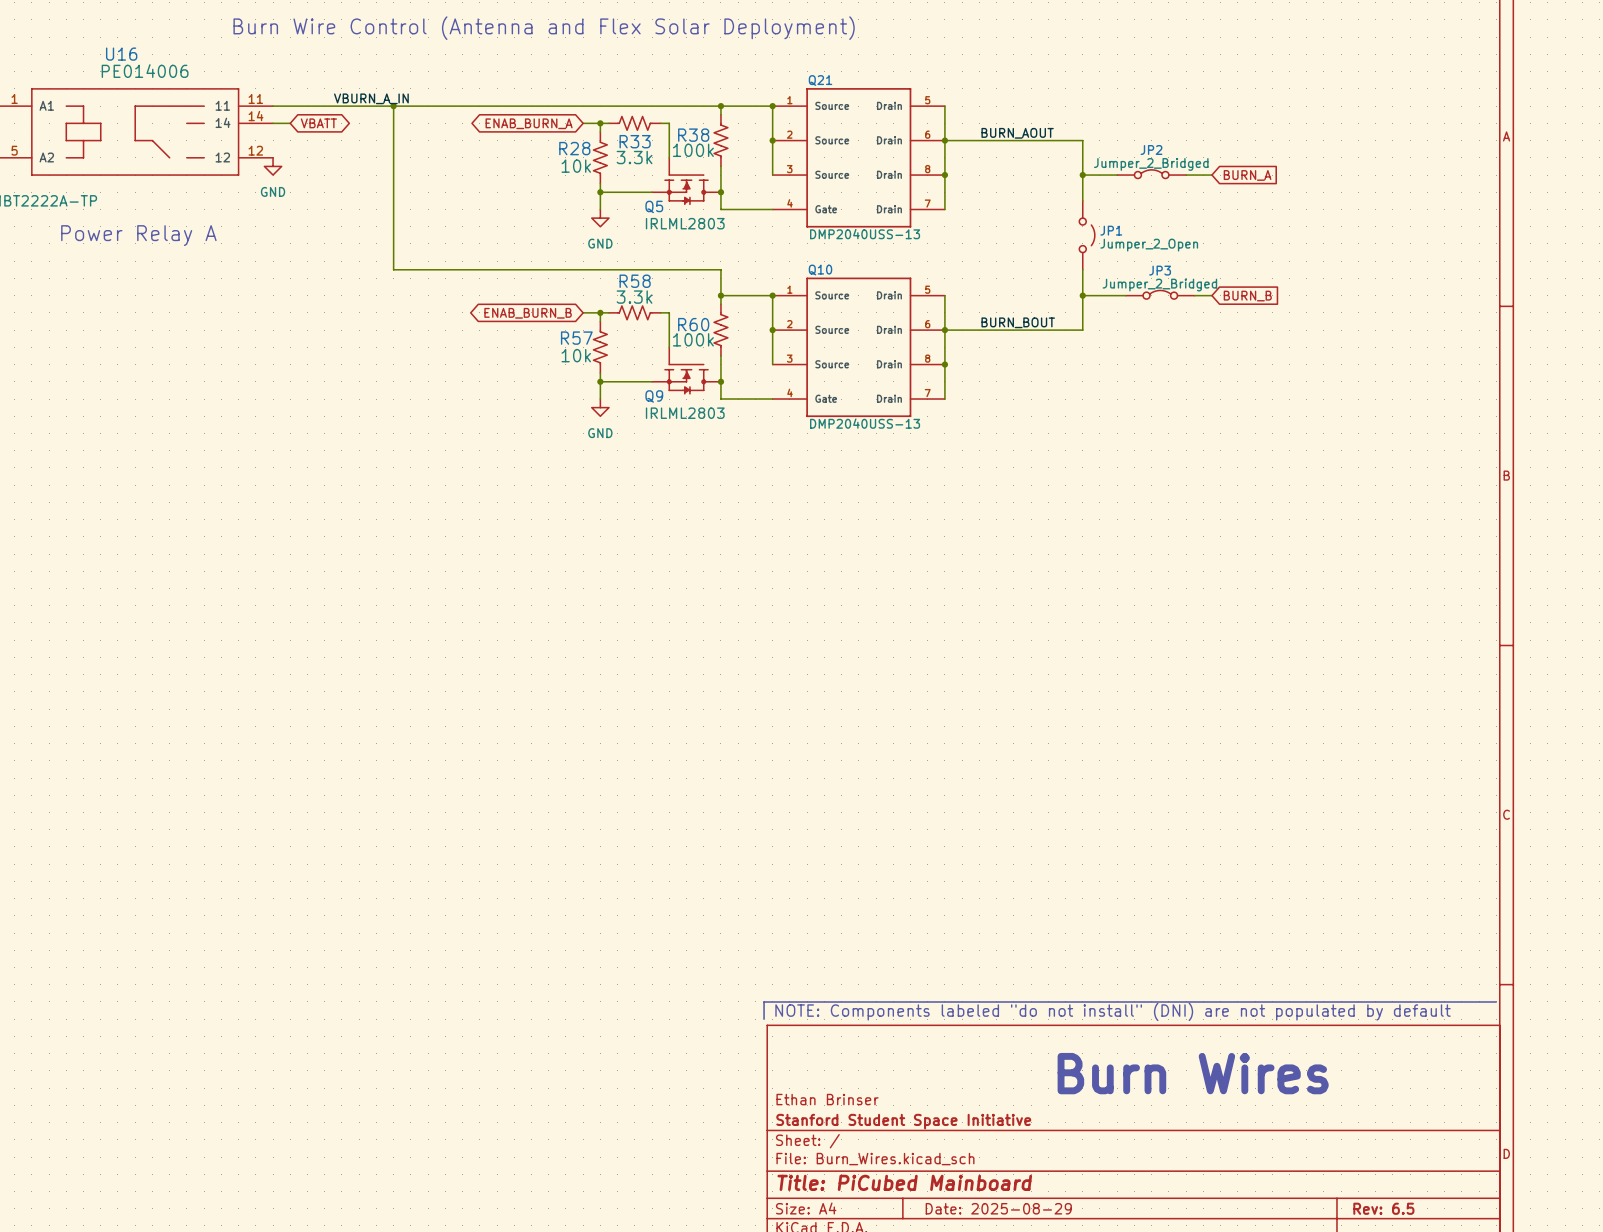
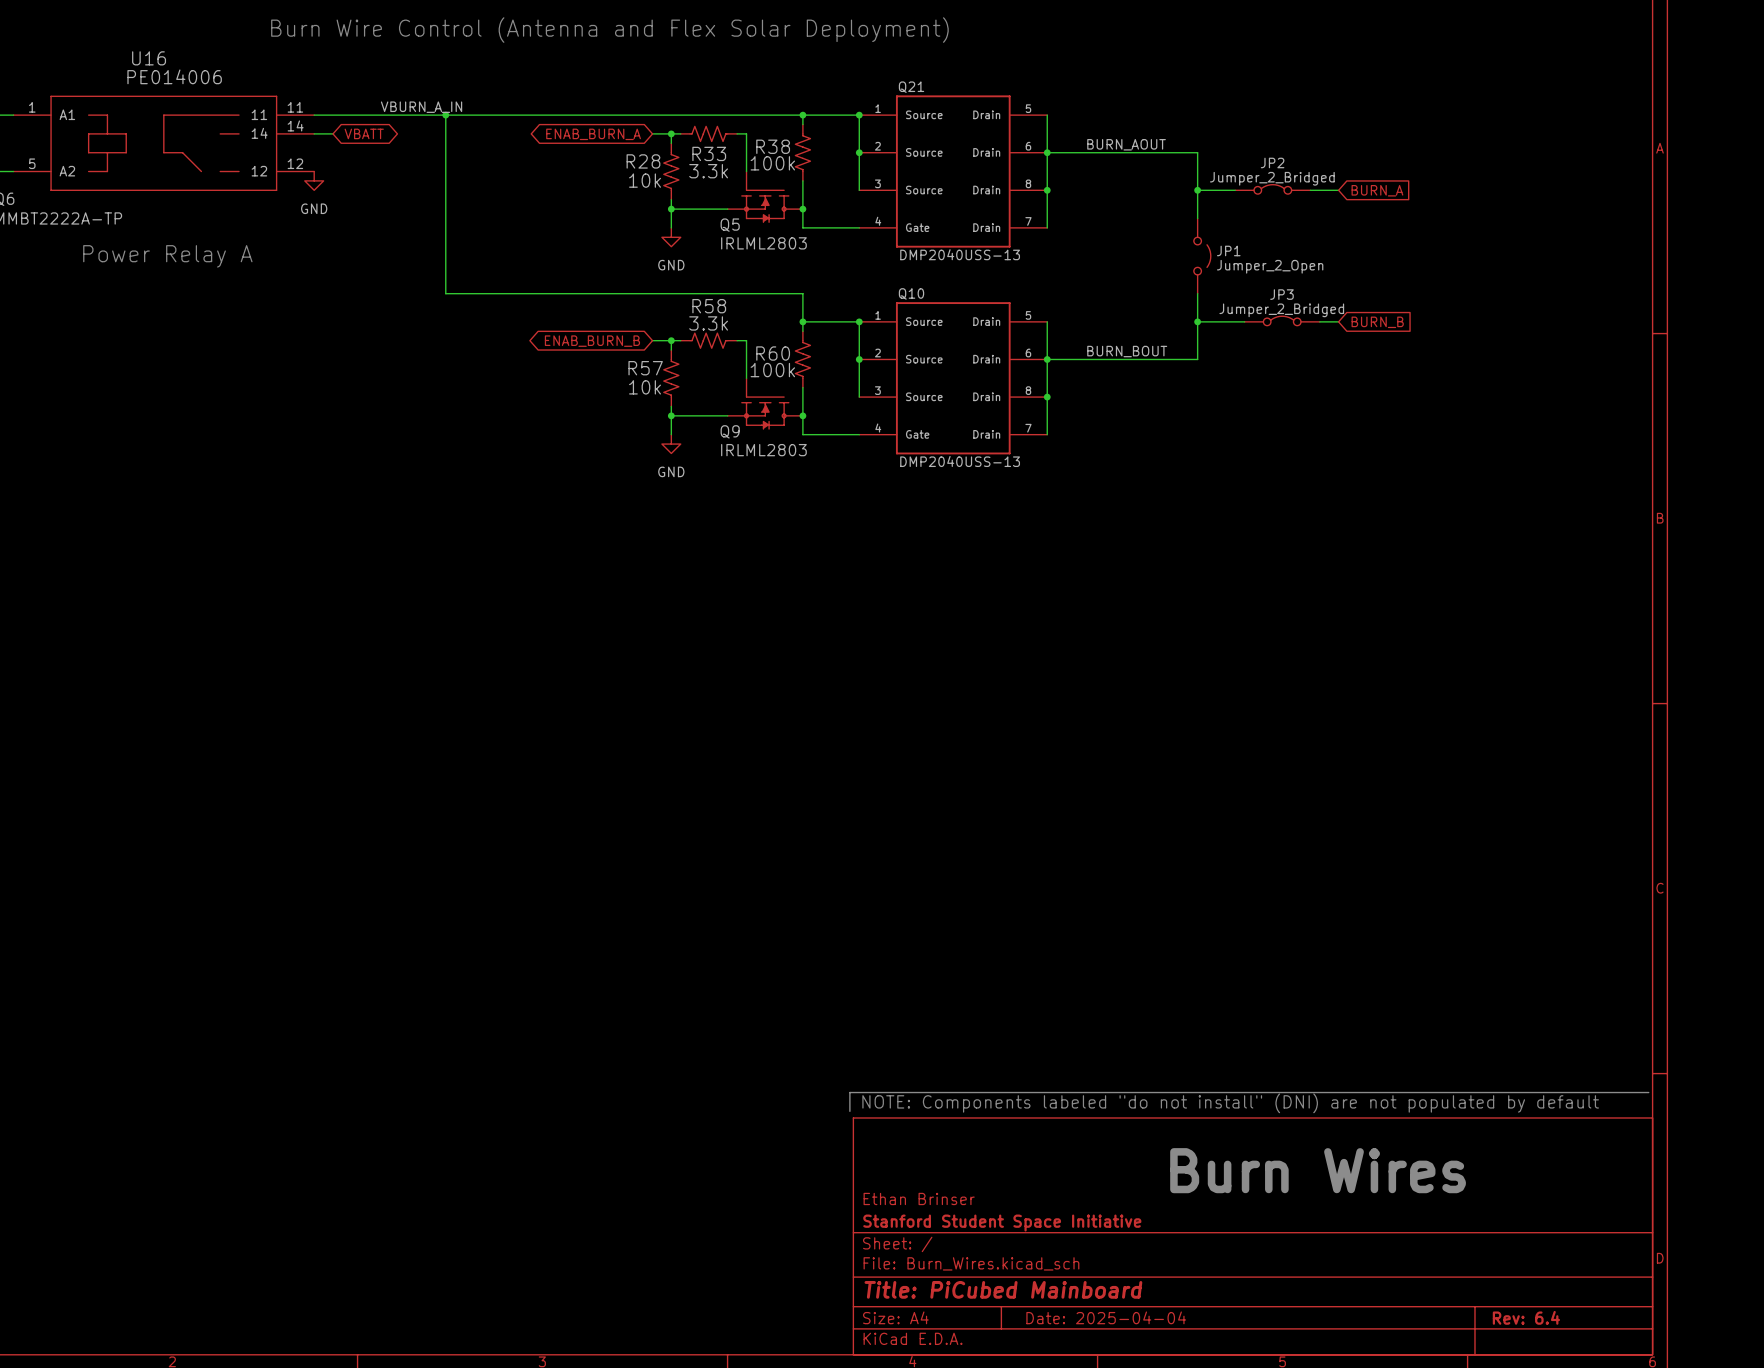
title block: Date: 2025-08-29 (998, 1208) -> Date: 2025-04-04 (1106, 1317)
title block: Rev: 6.5 (1383, 1208) -> Rev: 6.4 (1526, 1317)

